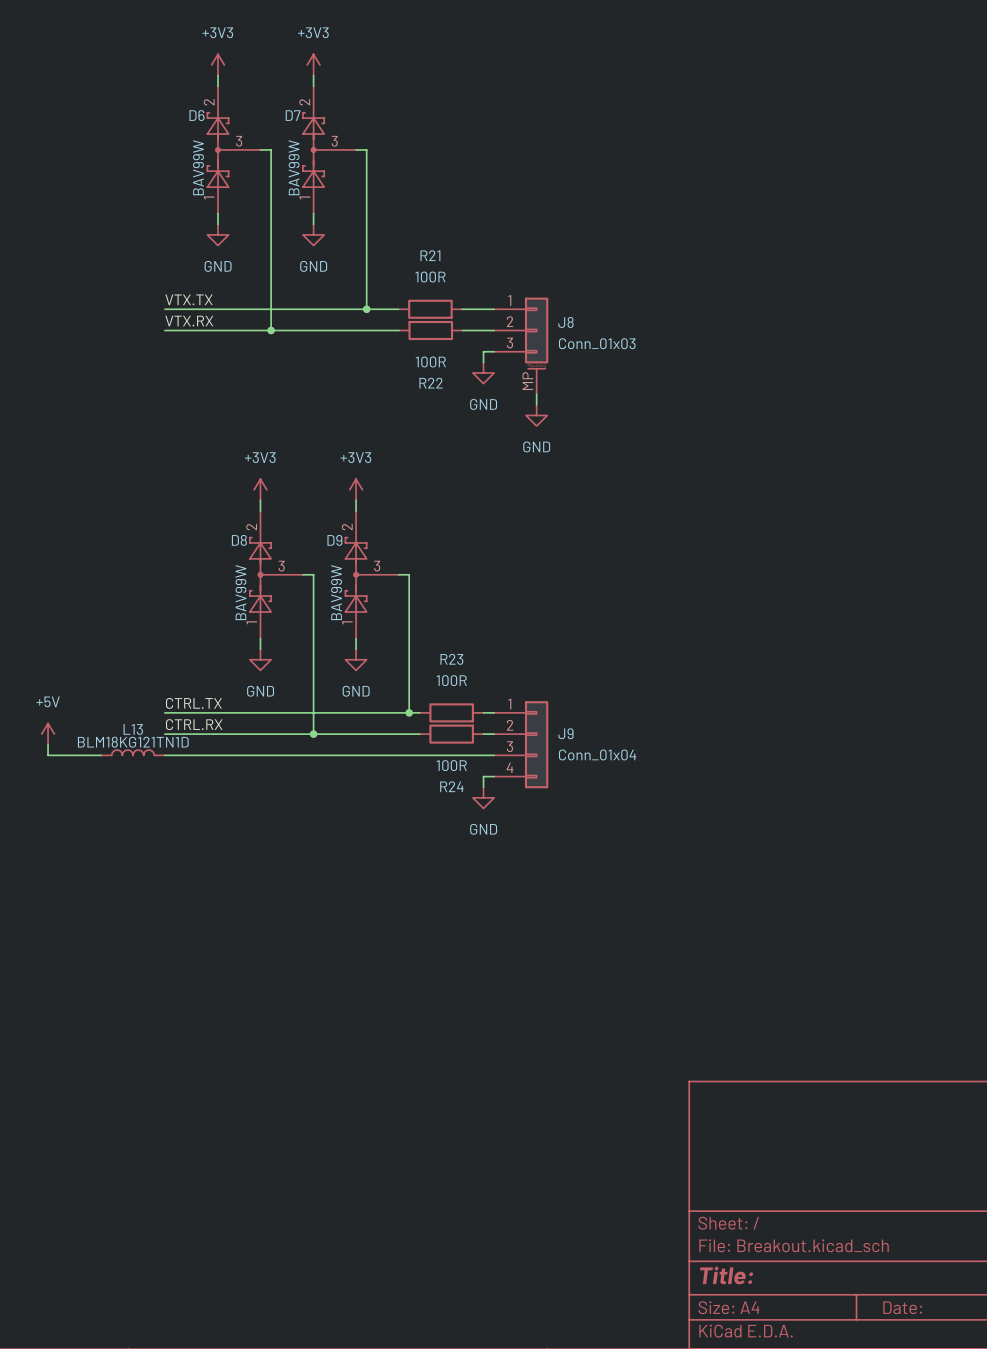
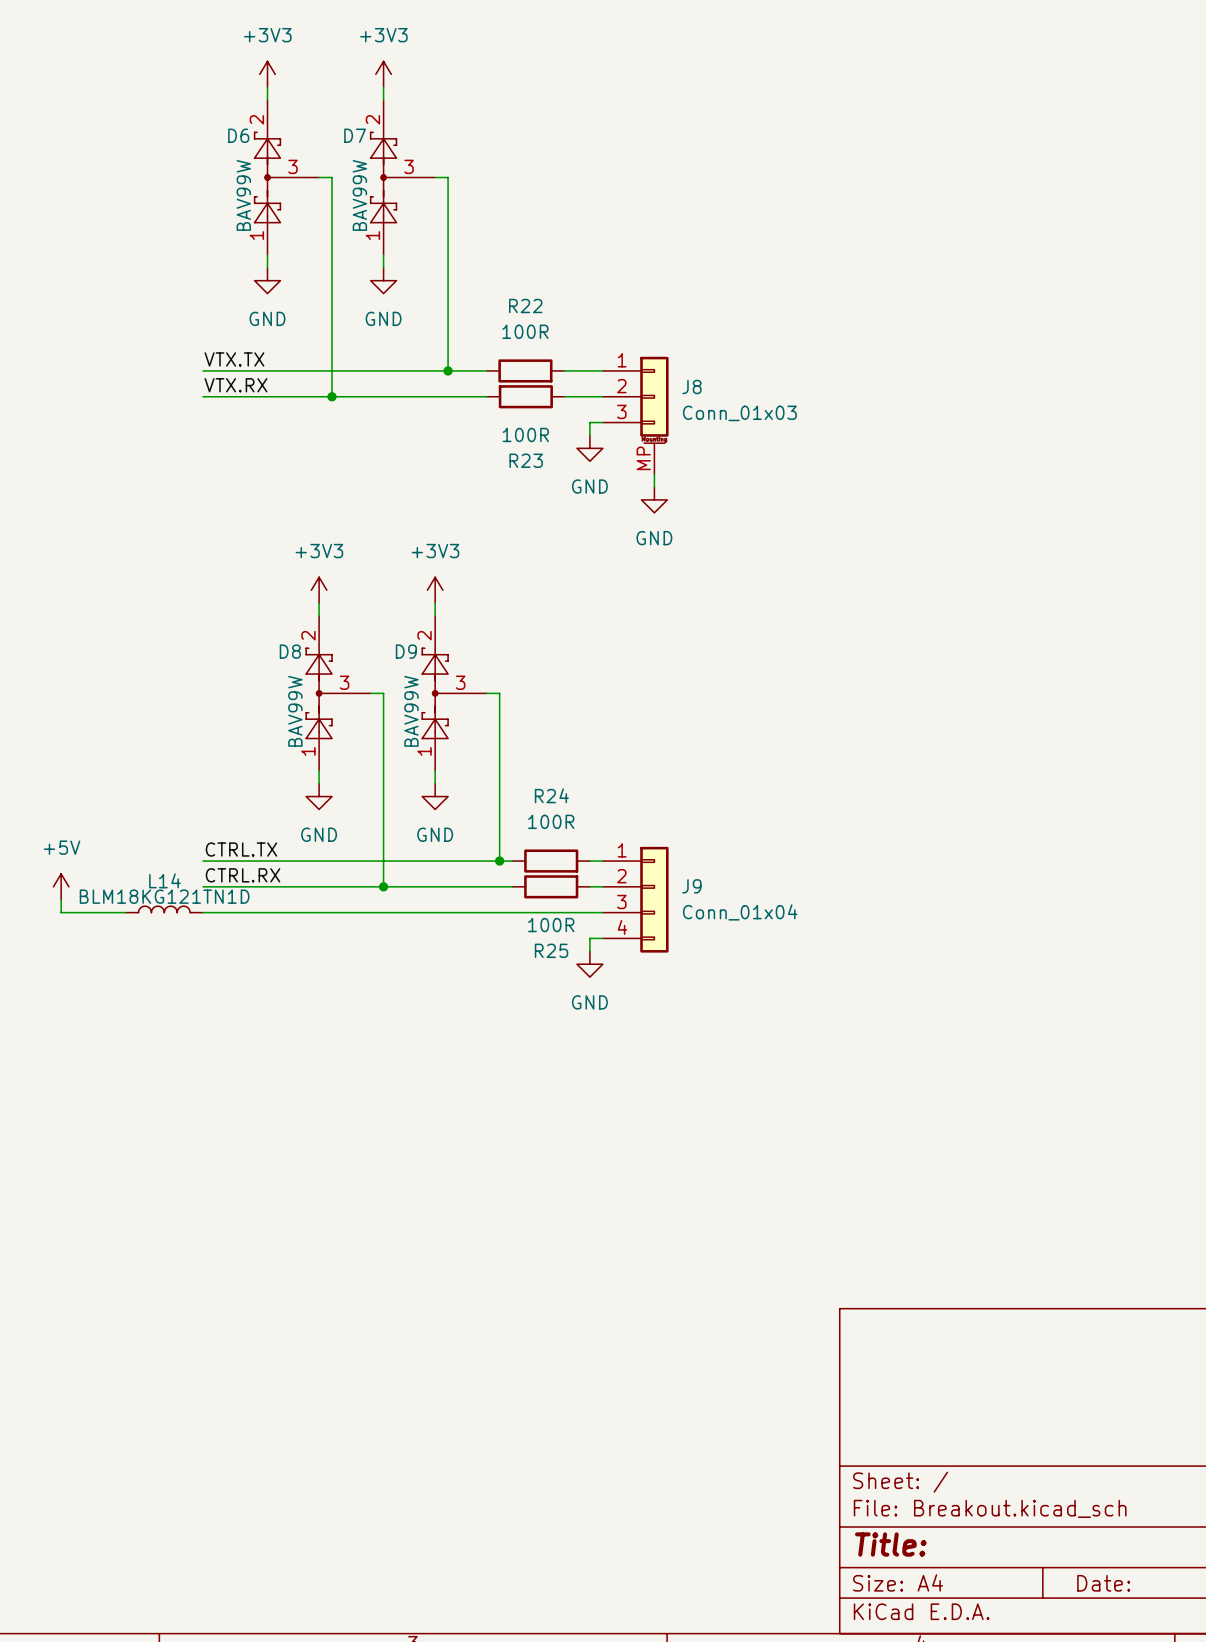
R21 name: R21 (430, 255) -> R22 (525, 306)
R22 name: R22 (431, 383) -> R23 (526, 460)
R23 name: R23 (451, 659) -> R24 (551, 795)
L13 name: L13 (133, 729) -> L14 (164, 880)
R24 name: R24 (451, 786) -> R25 (551, 950)

